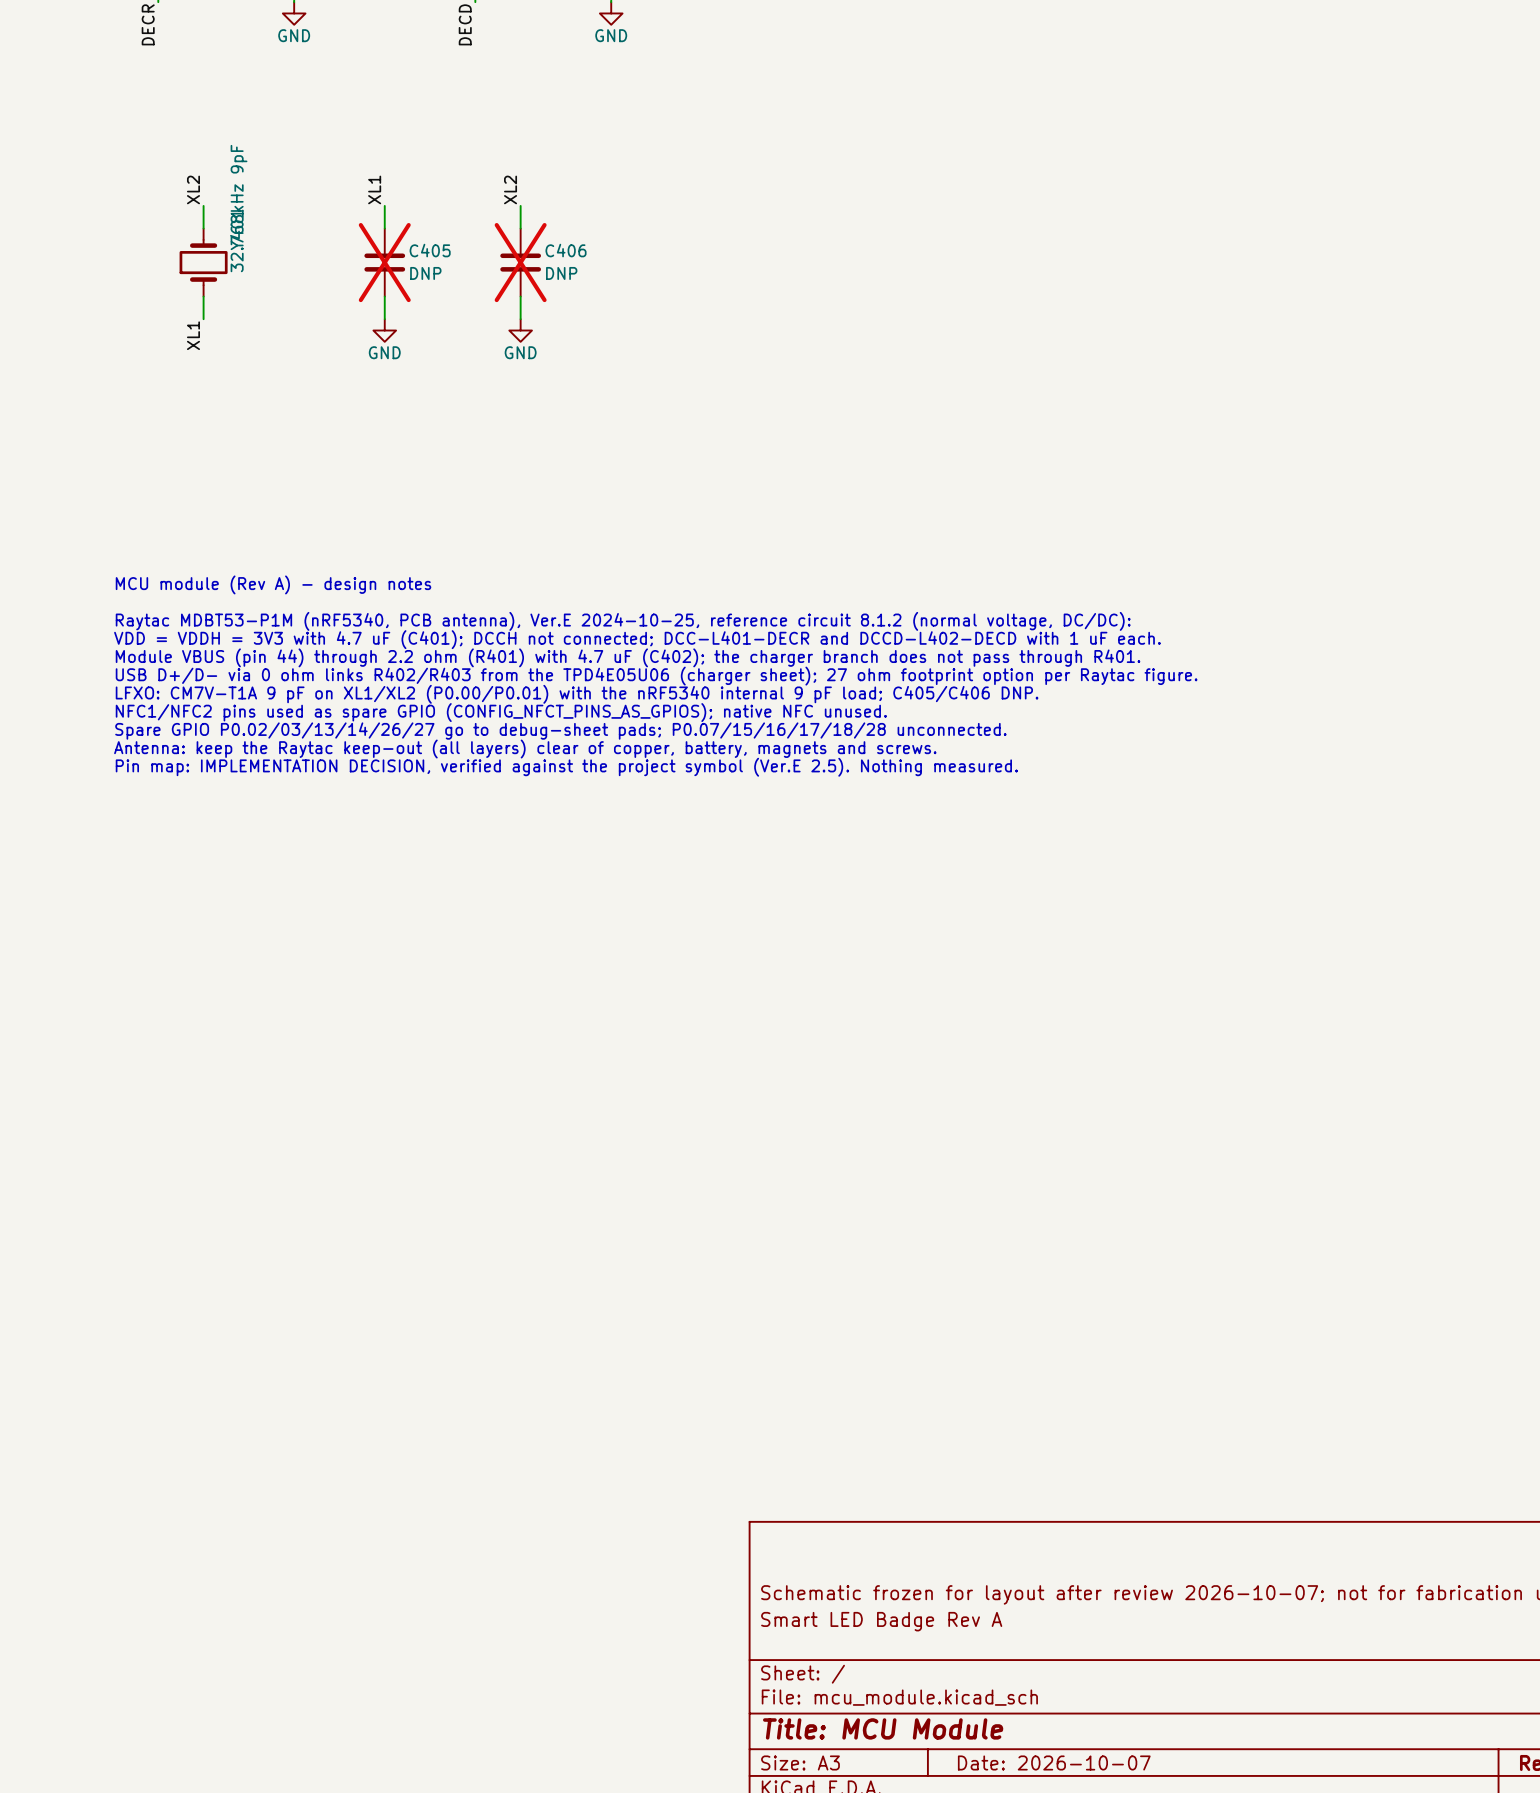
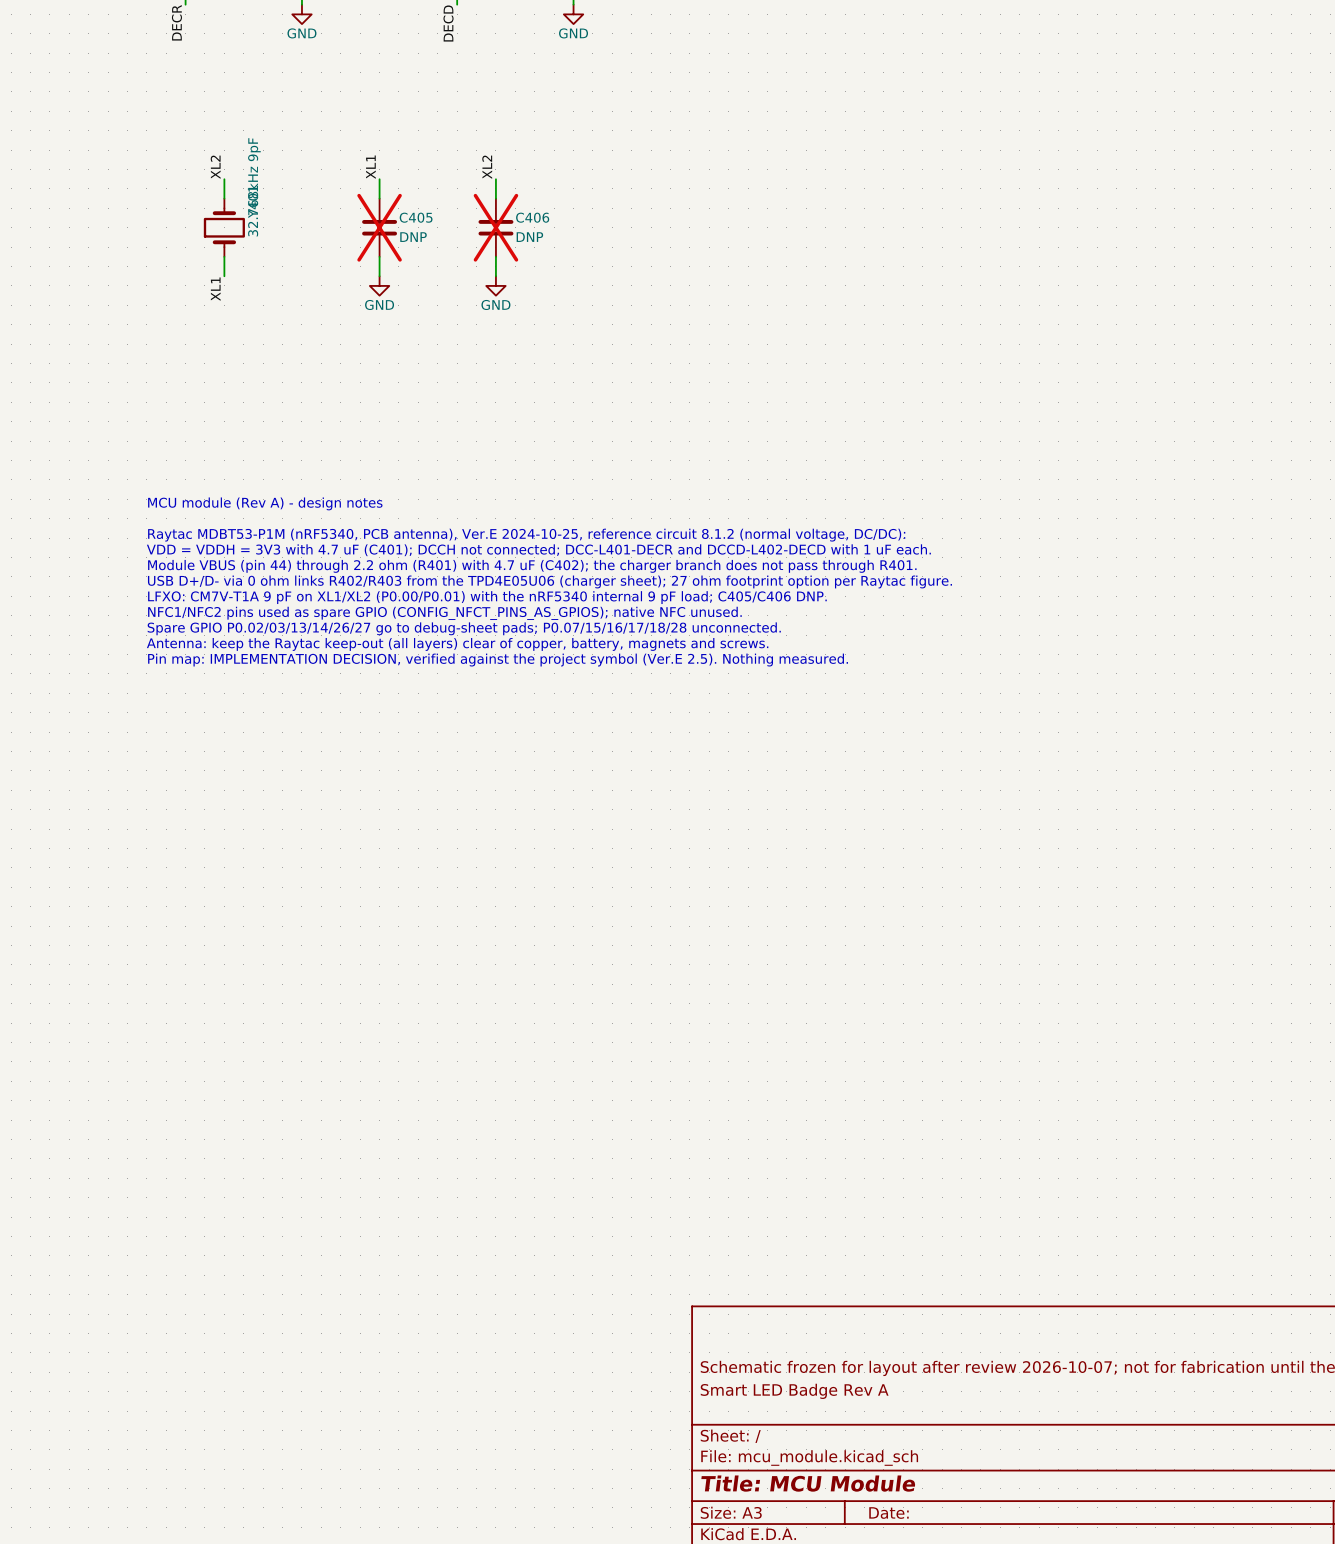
title block: Date: 2026-10-07 (1054, 1762) -> Date: (889, 1513)

